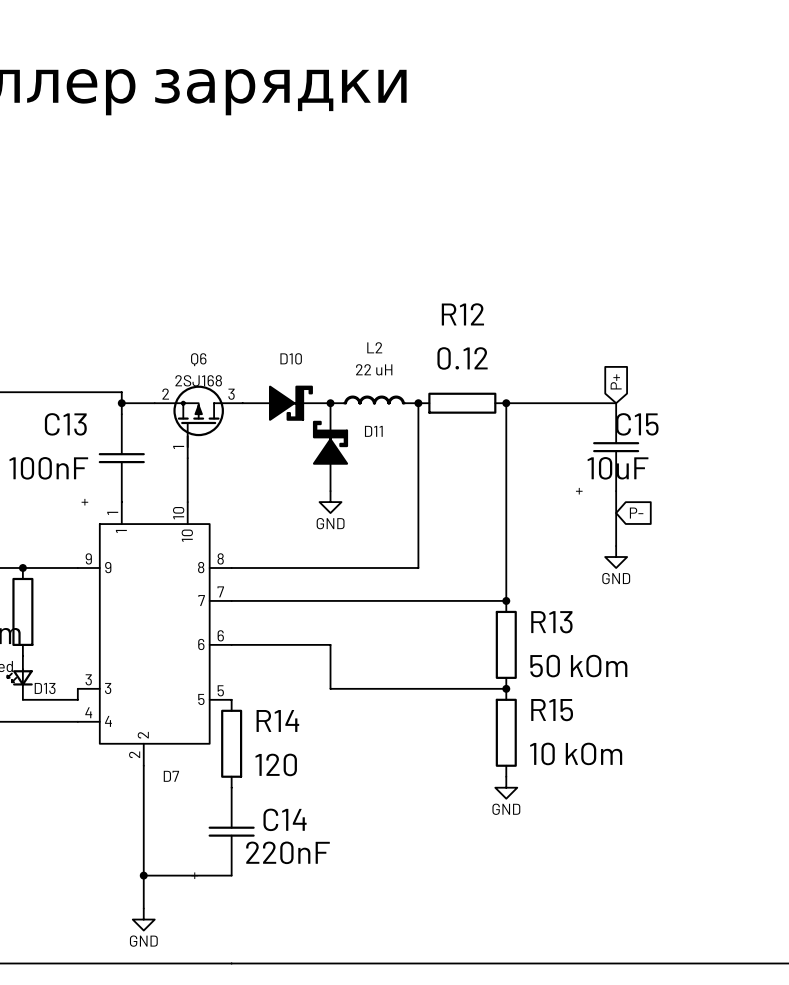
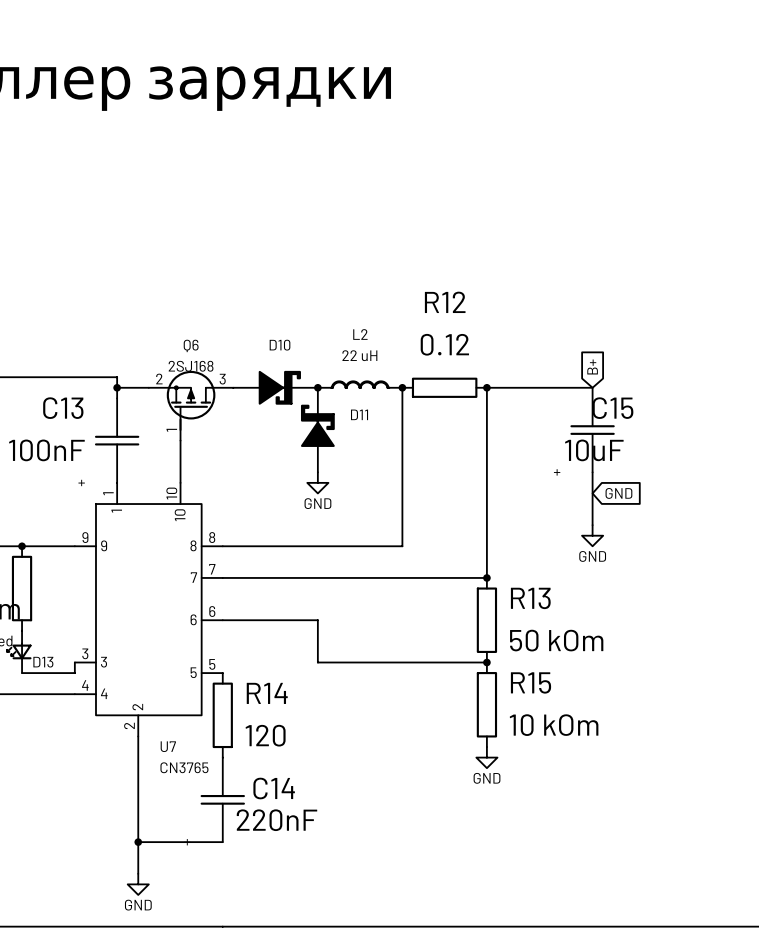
global label: P+ (616, 381) -> B+ (592, 366)
global label: P- (636, 513) -> GND (618, 493)
D7 name: D7 (171, 776) -> U7 (168, 746)
D7 value: none -> CN3765 (184, 767)

